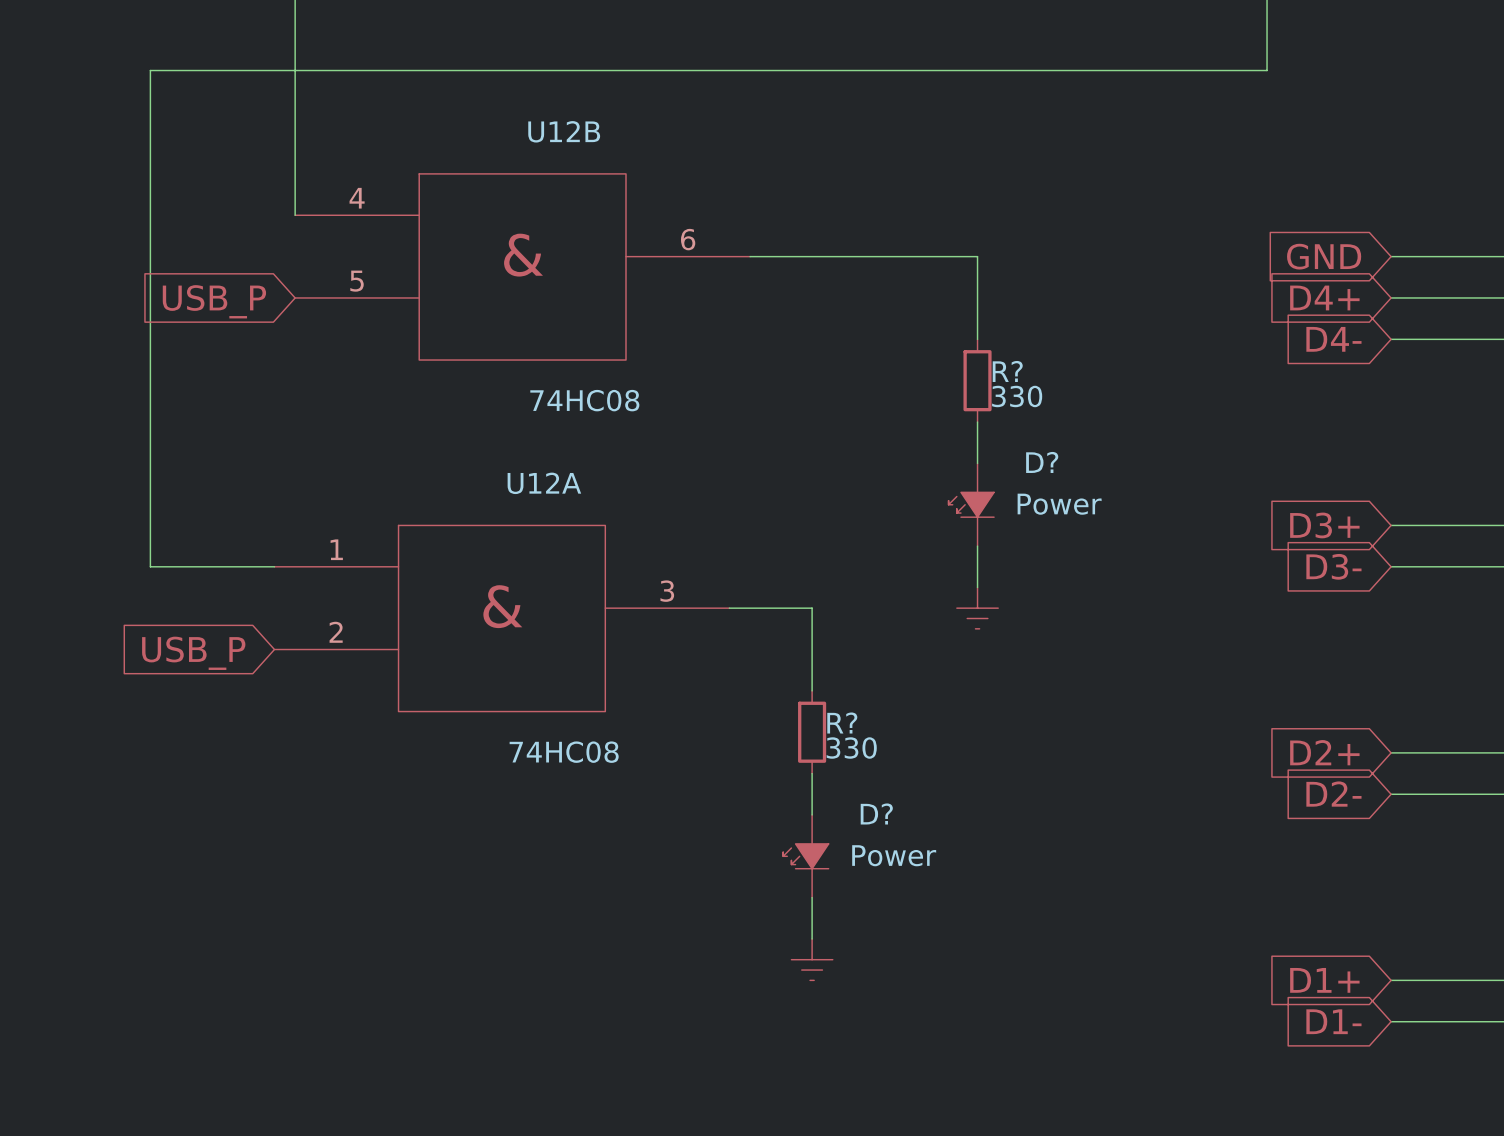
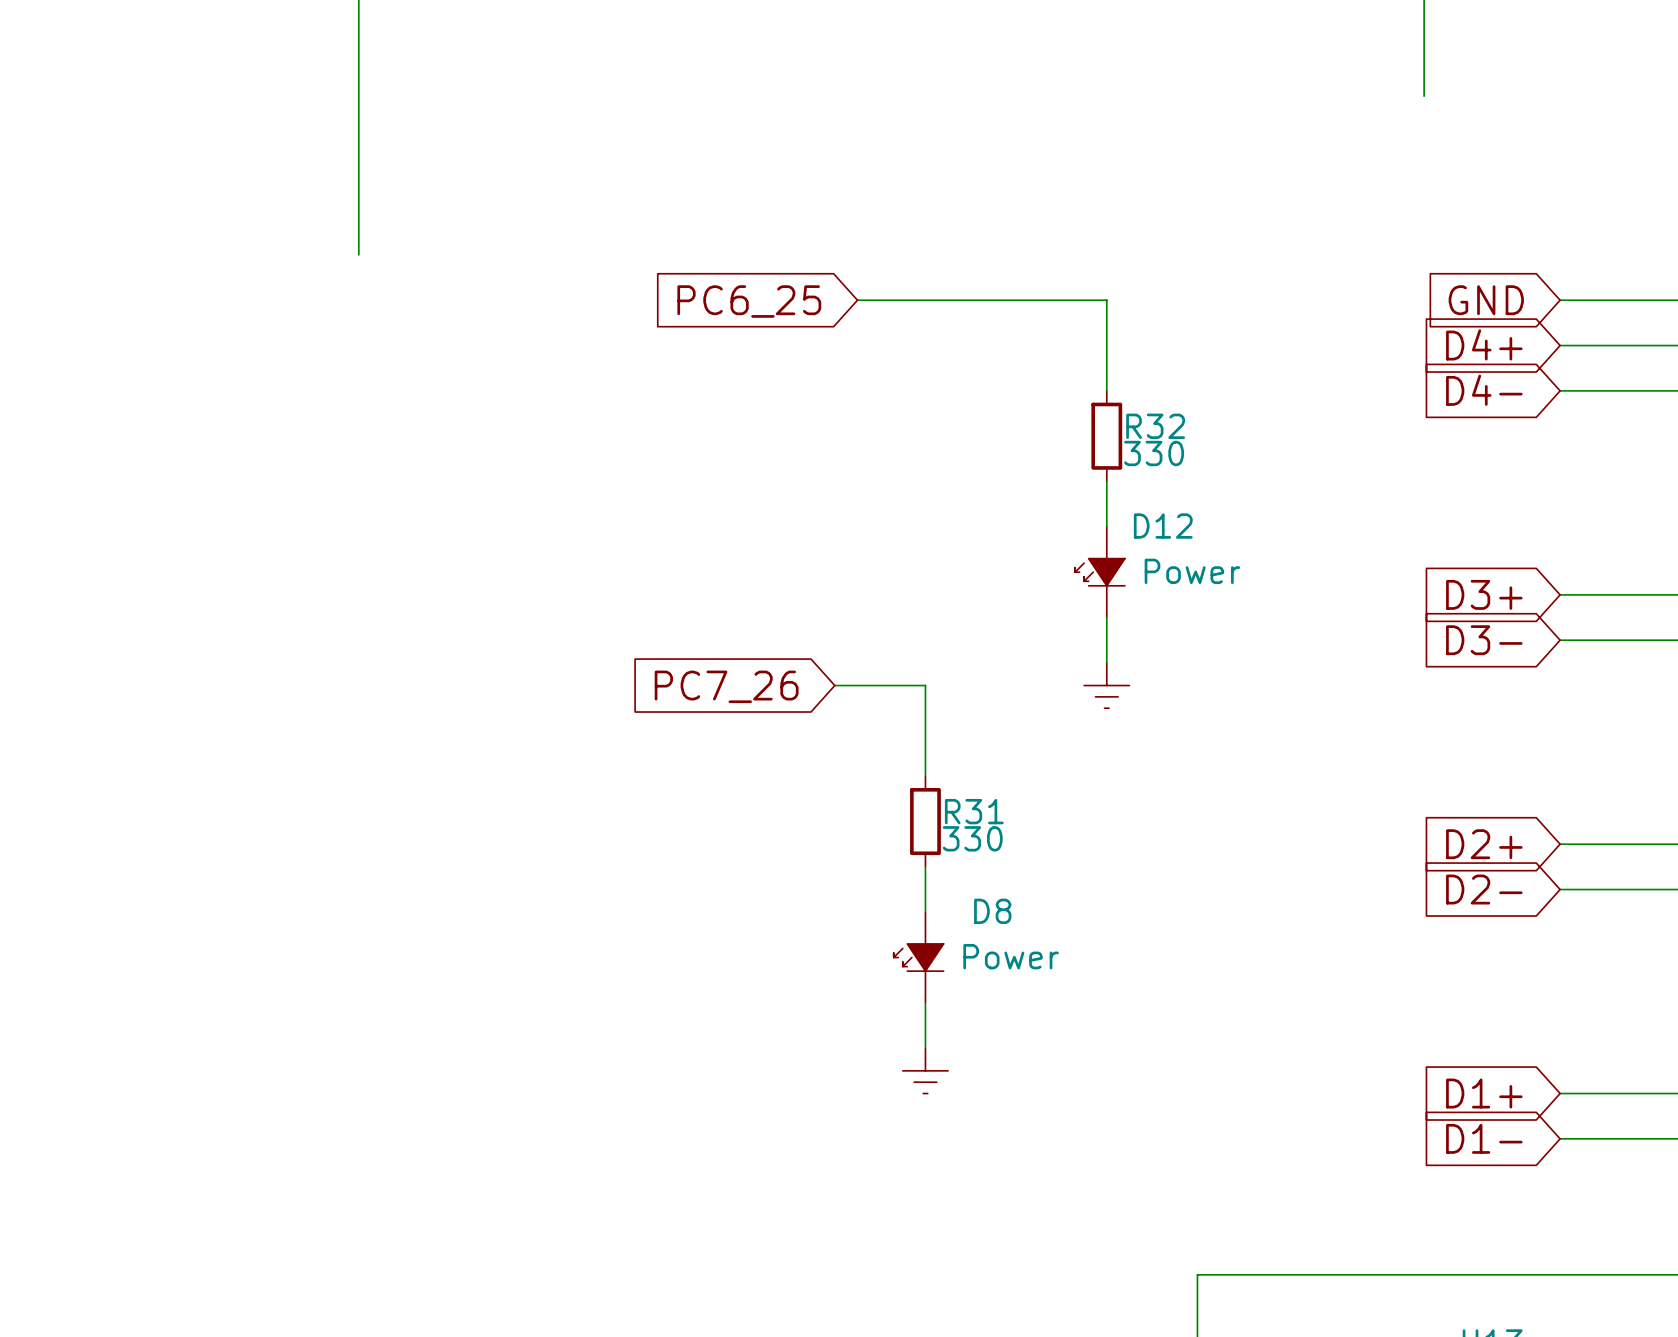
wire: (1267, 70) (150, 70) (150, 566) (274, 566) -> none
global label: none -> PC6_25 (749, 301)
U12B: 74HC08 (522, 266) -> none
global label: USB_P (214, 301) -> none
R? name: R? (1007, 371) -> R32 (1155, 426)
D? name: D? (1042, 462) -> D12 (1163, 526)
global label: none -> PC7_26 (726, 686)
U12A: 74HC08 (501, 618) -> none
global label: USB_P (193, 653) -> none
R? name: R? (842, 723) -> R31 (974, 811)
D? name: D? (876, 813) -> D8 (992, 911)

